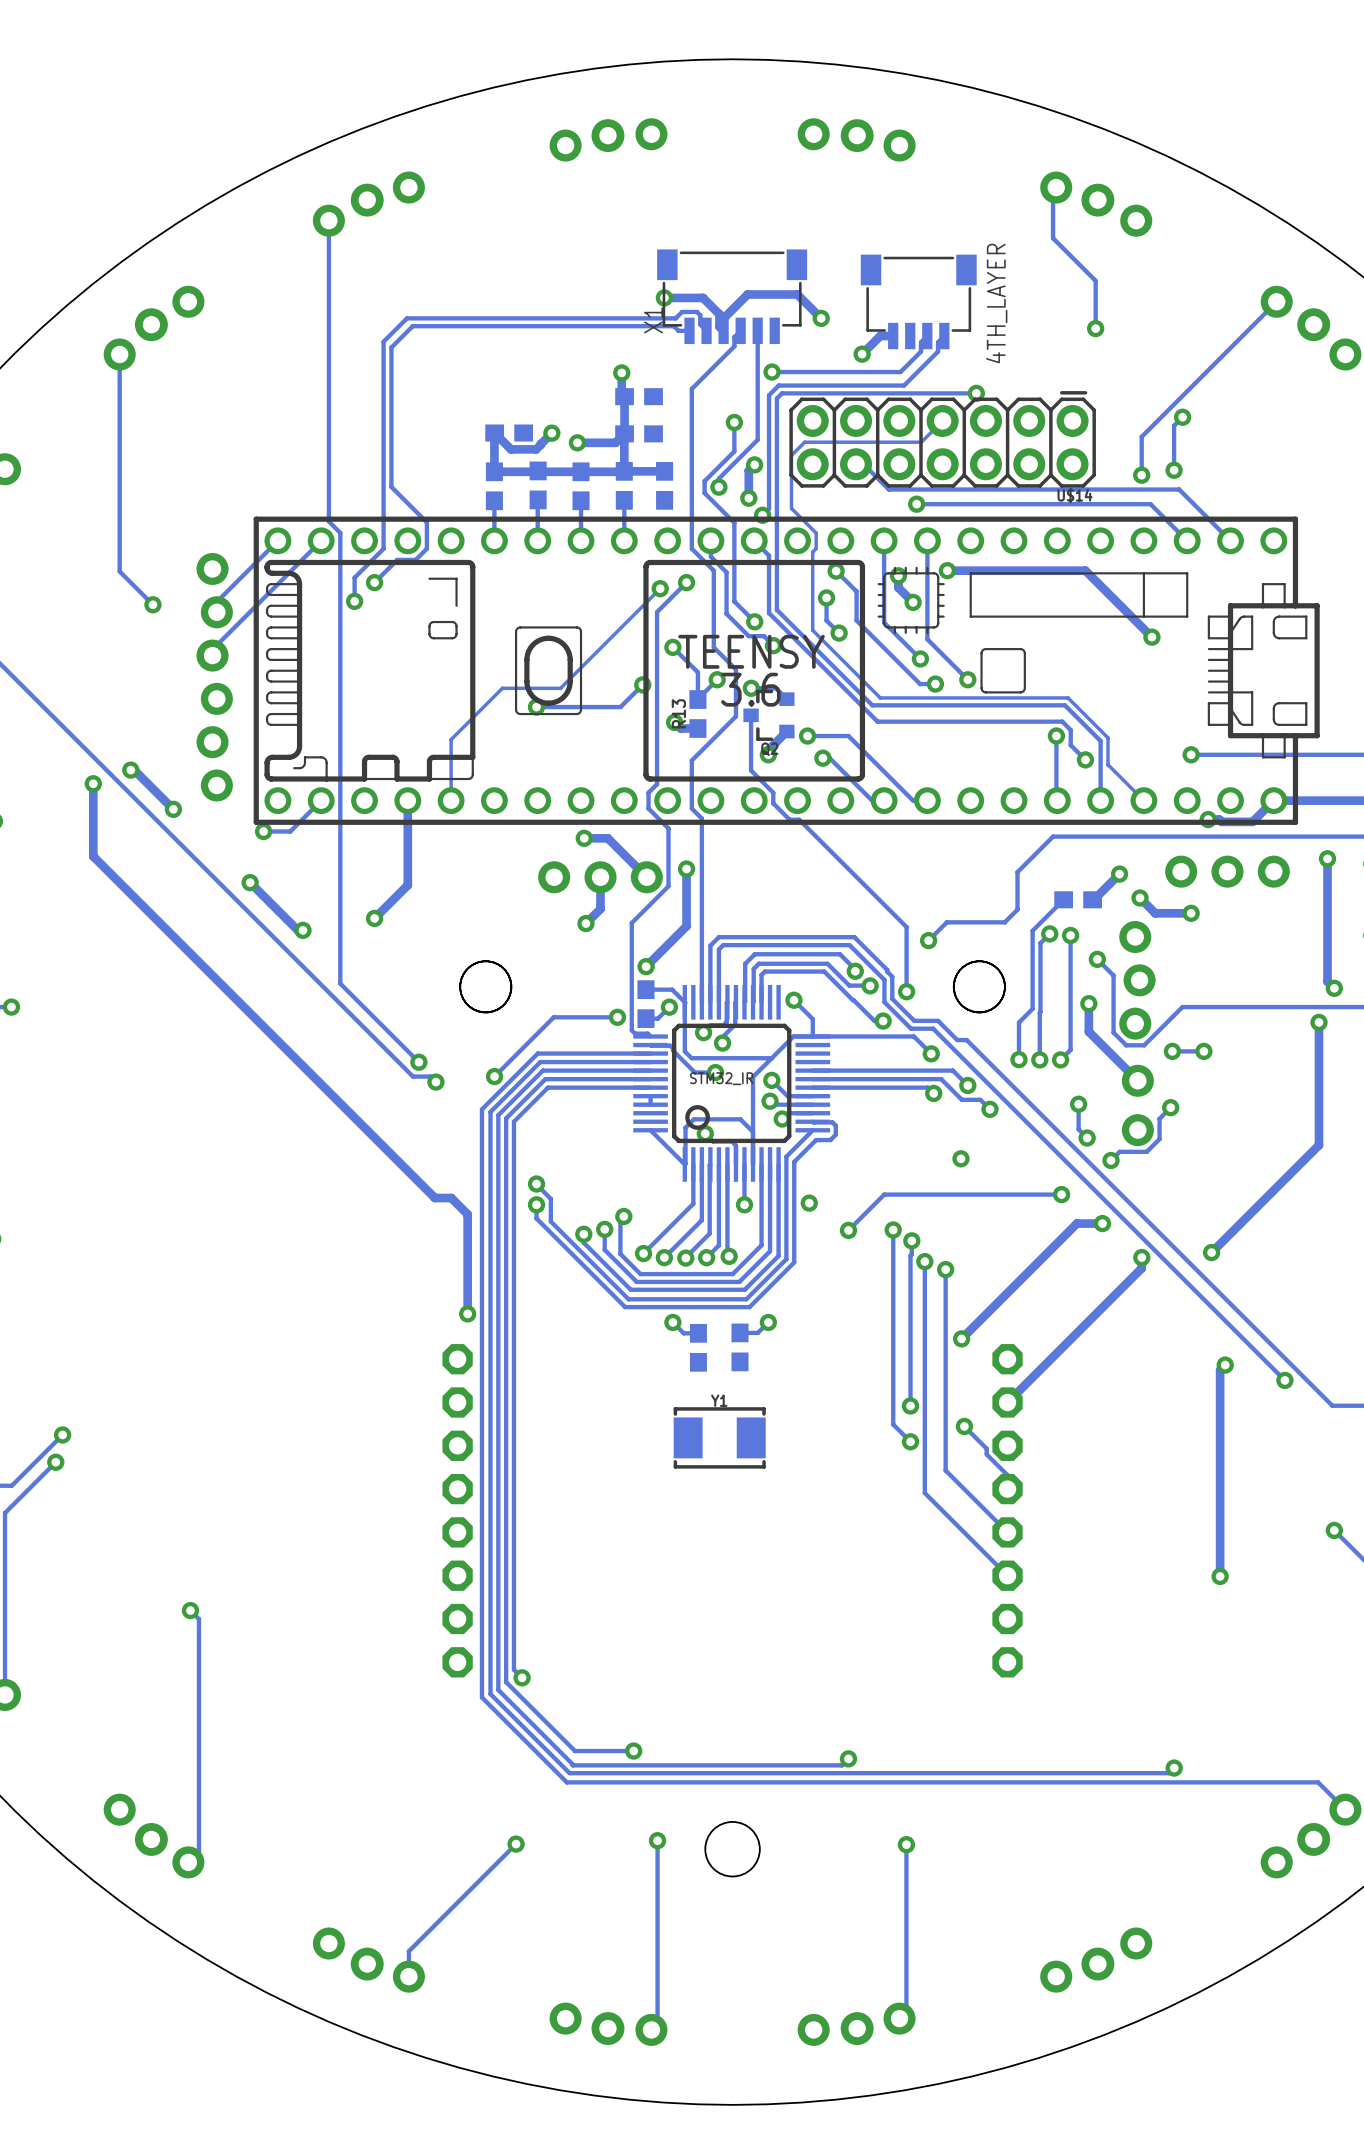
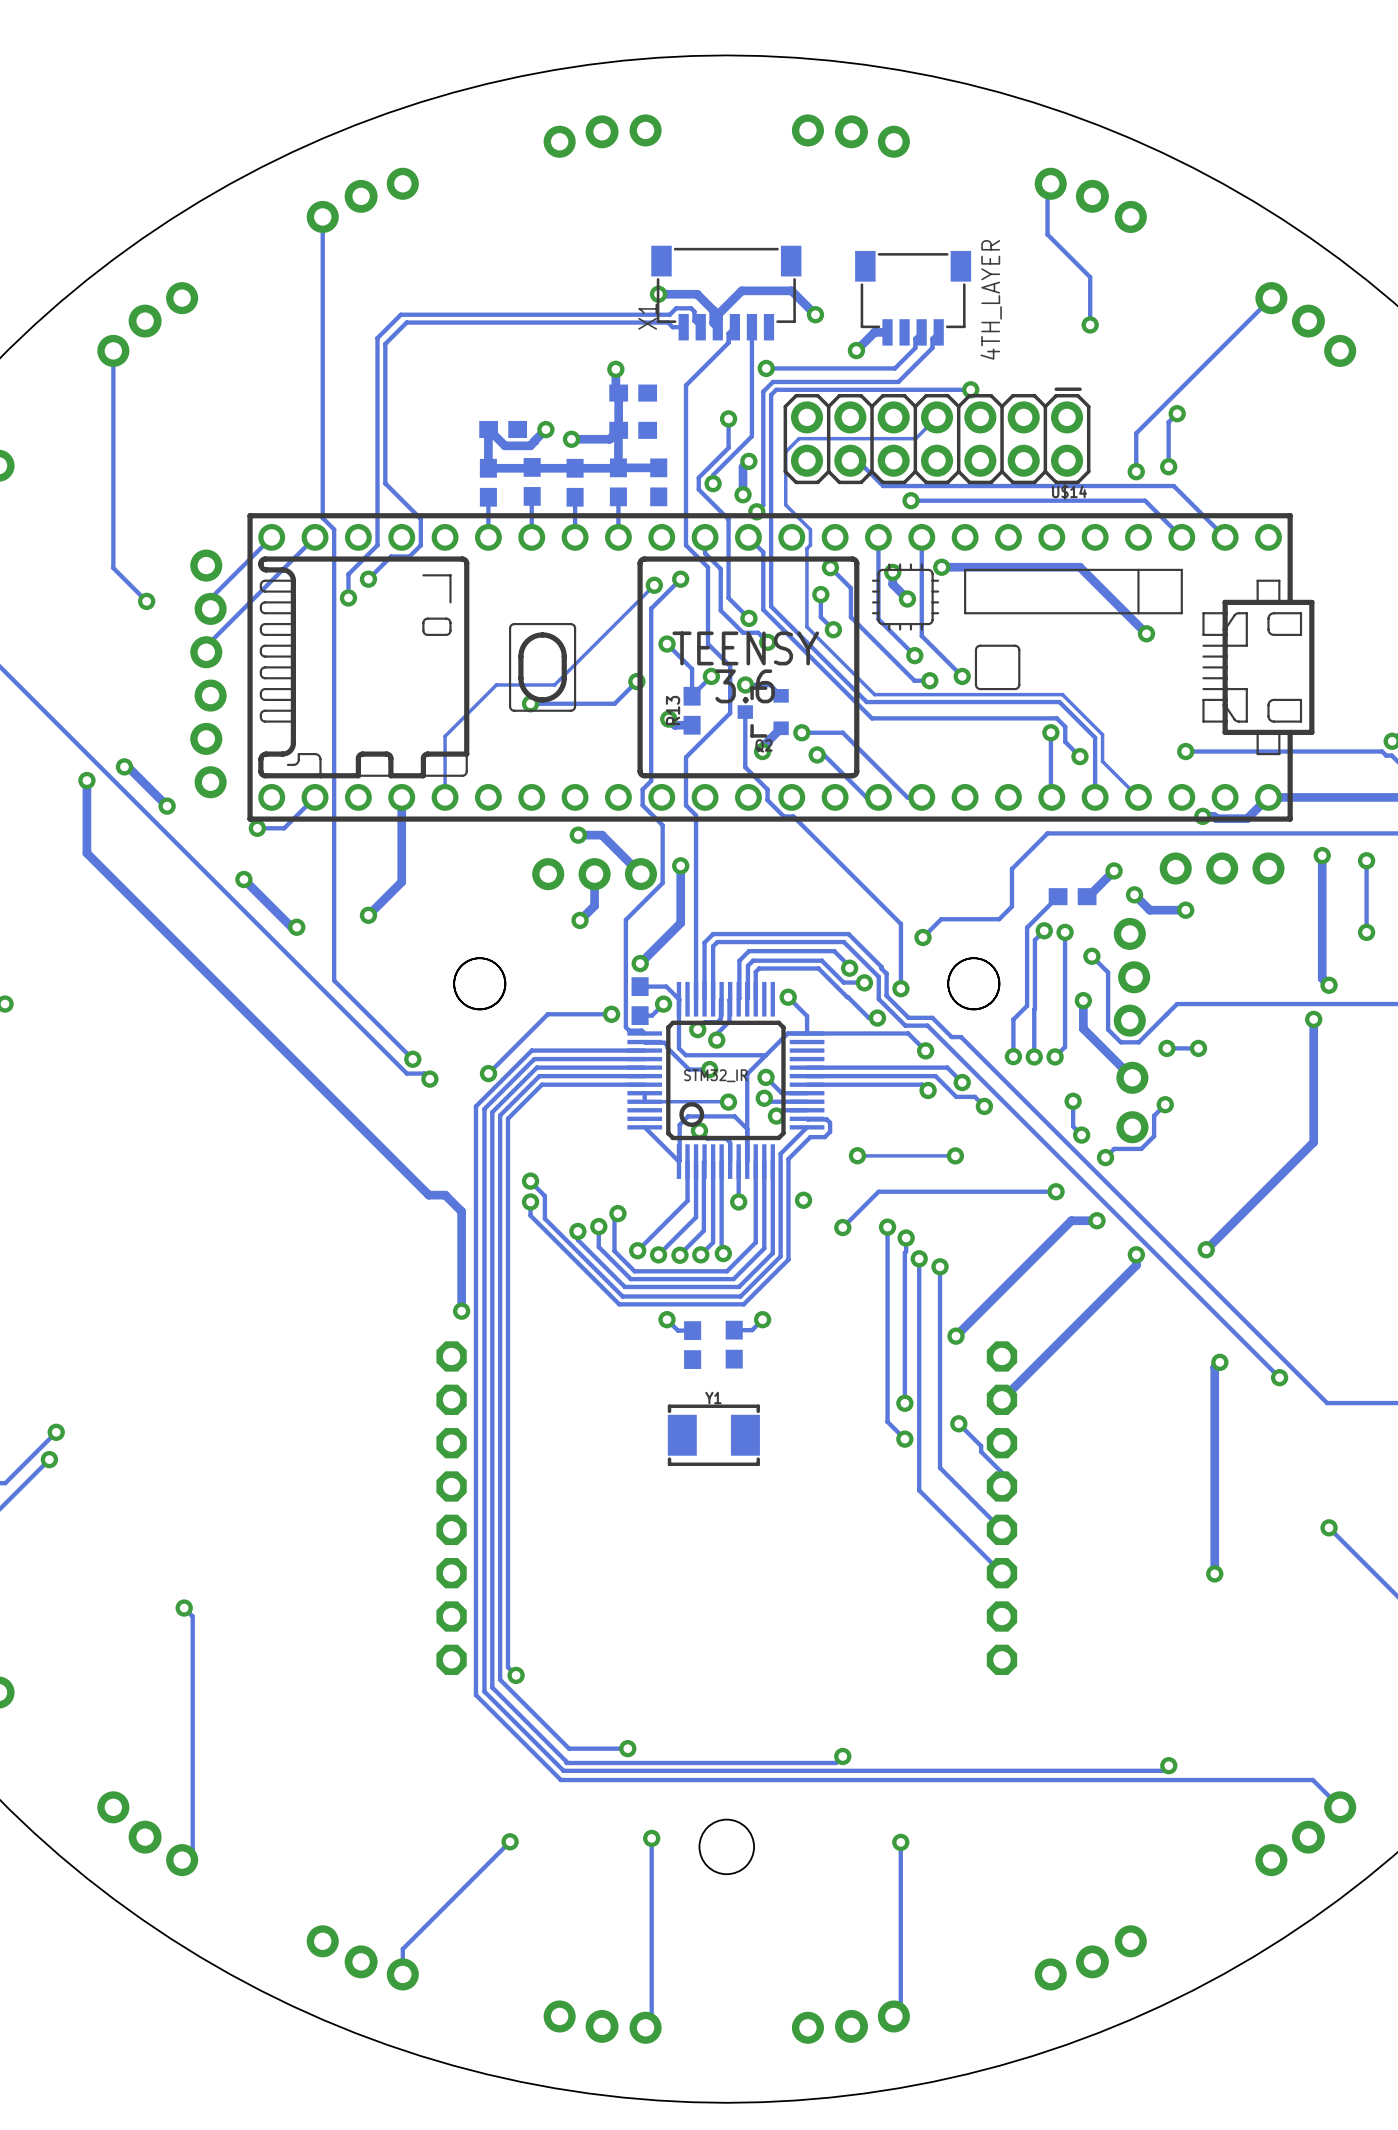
track: none -> (644, 1101) (728, 1102)
via: none -> (728, 1102)
via: none -> (857, 1155)
track: none -> (955, 1155) (857, 1155)

